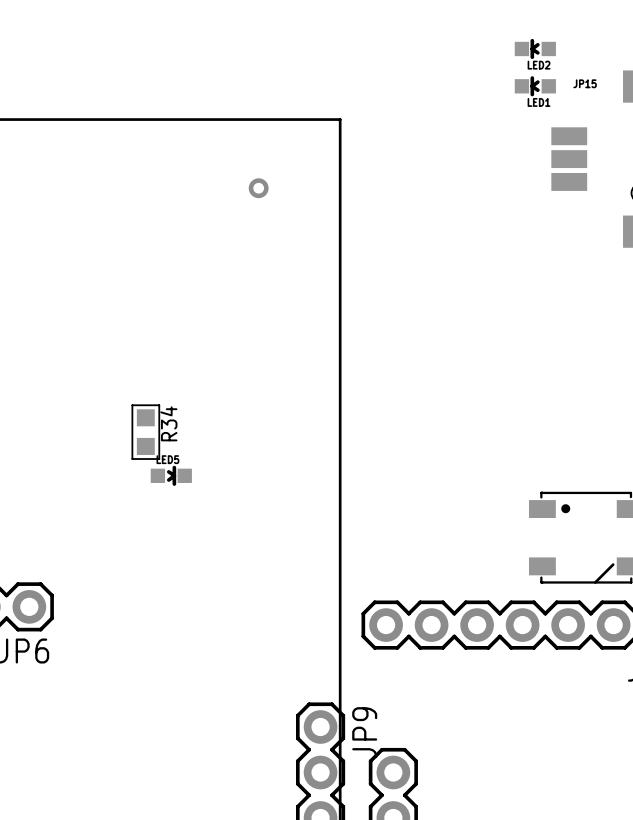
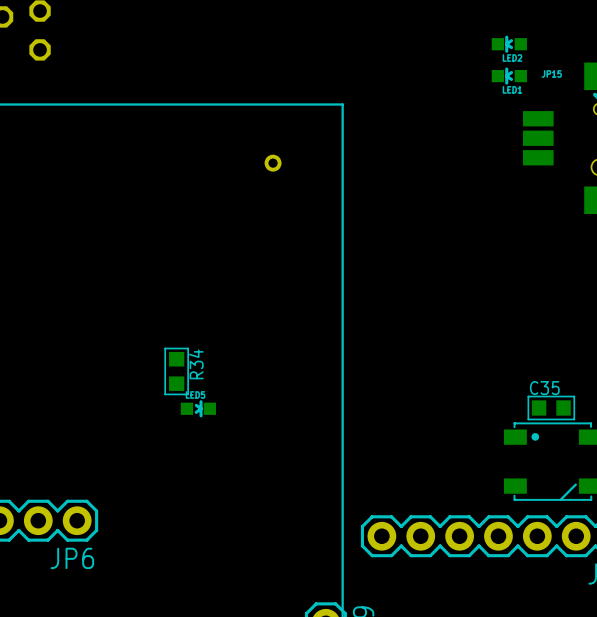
C35: none -> (551, 407)

